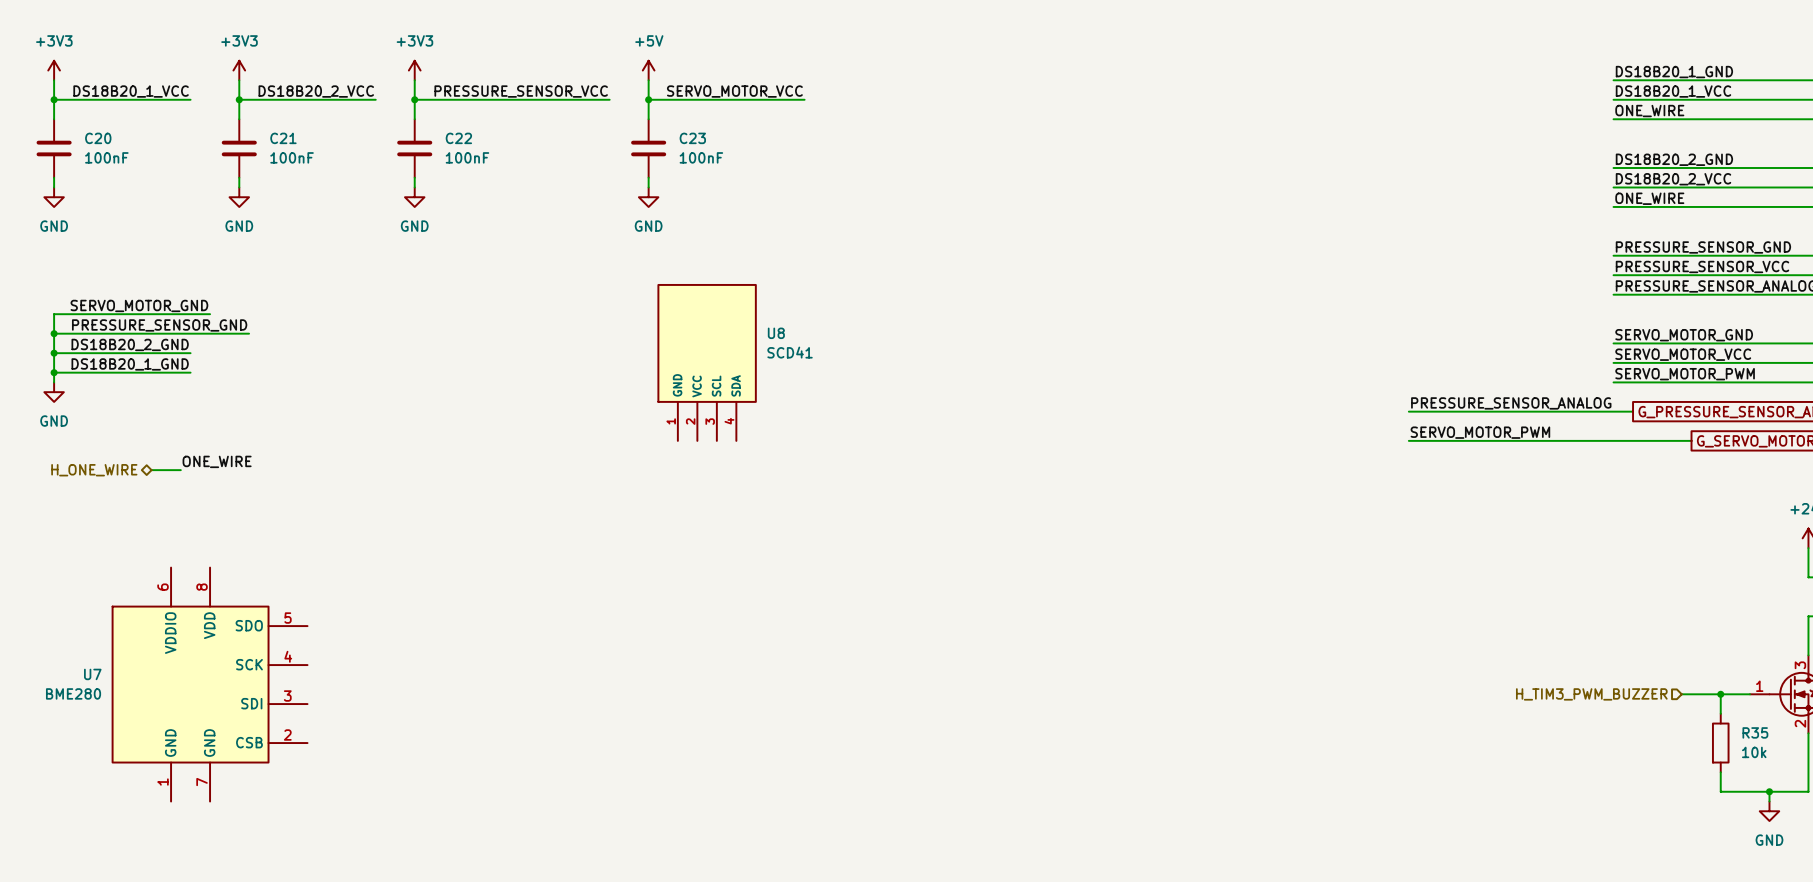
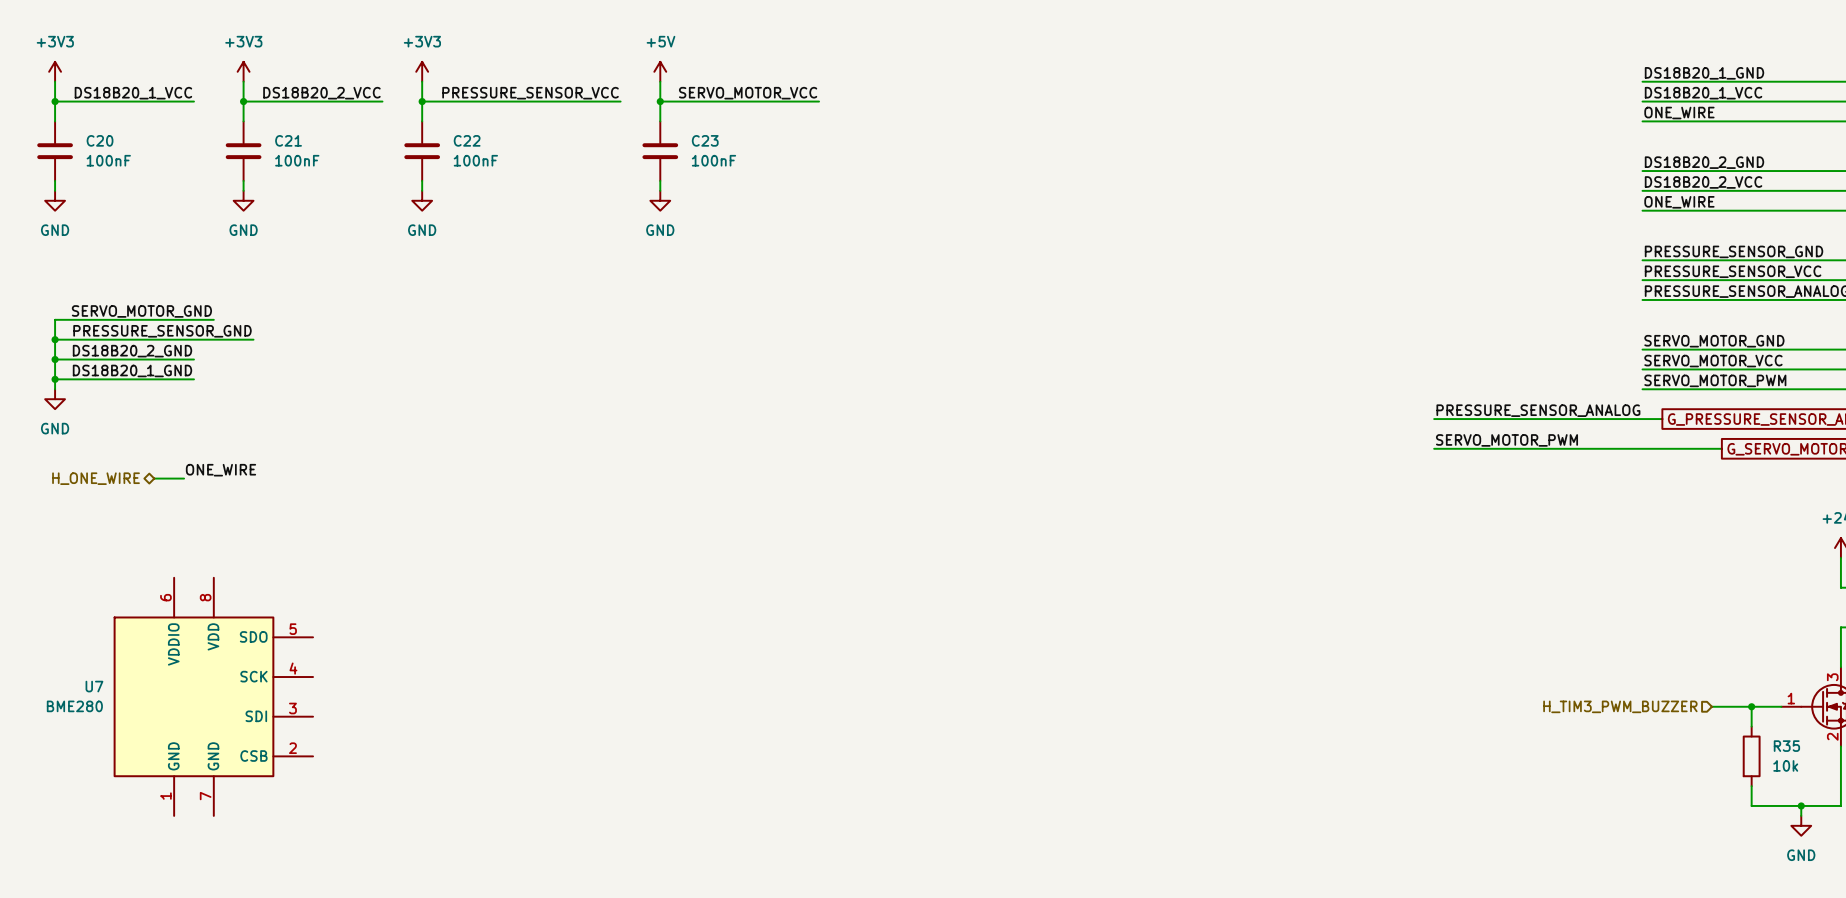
U8: SCD41 (707, 362) -> none

